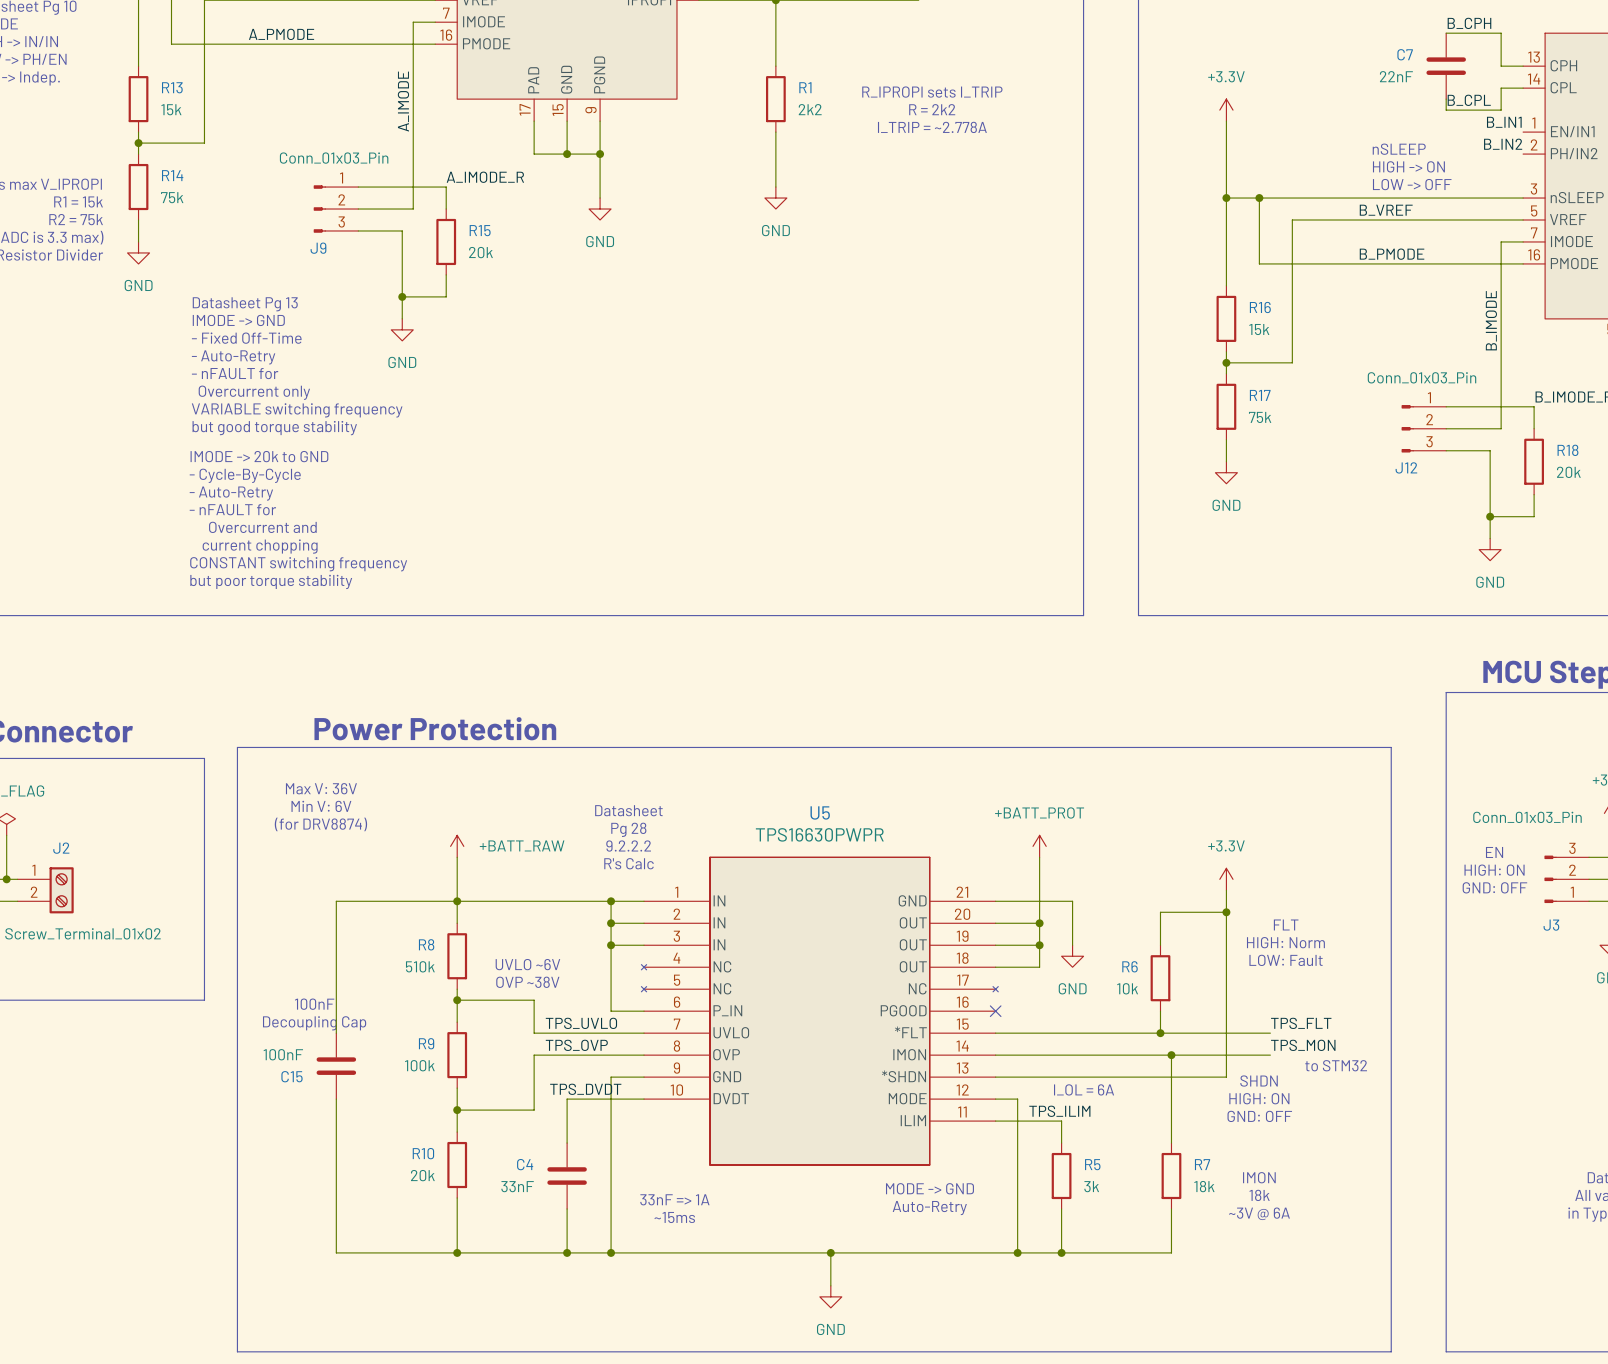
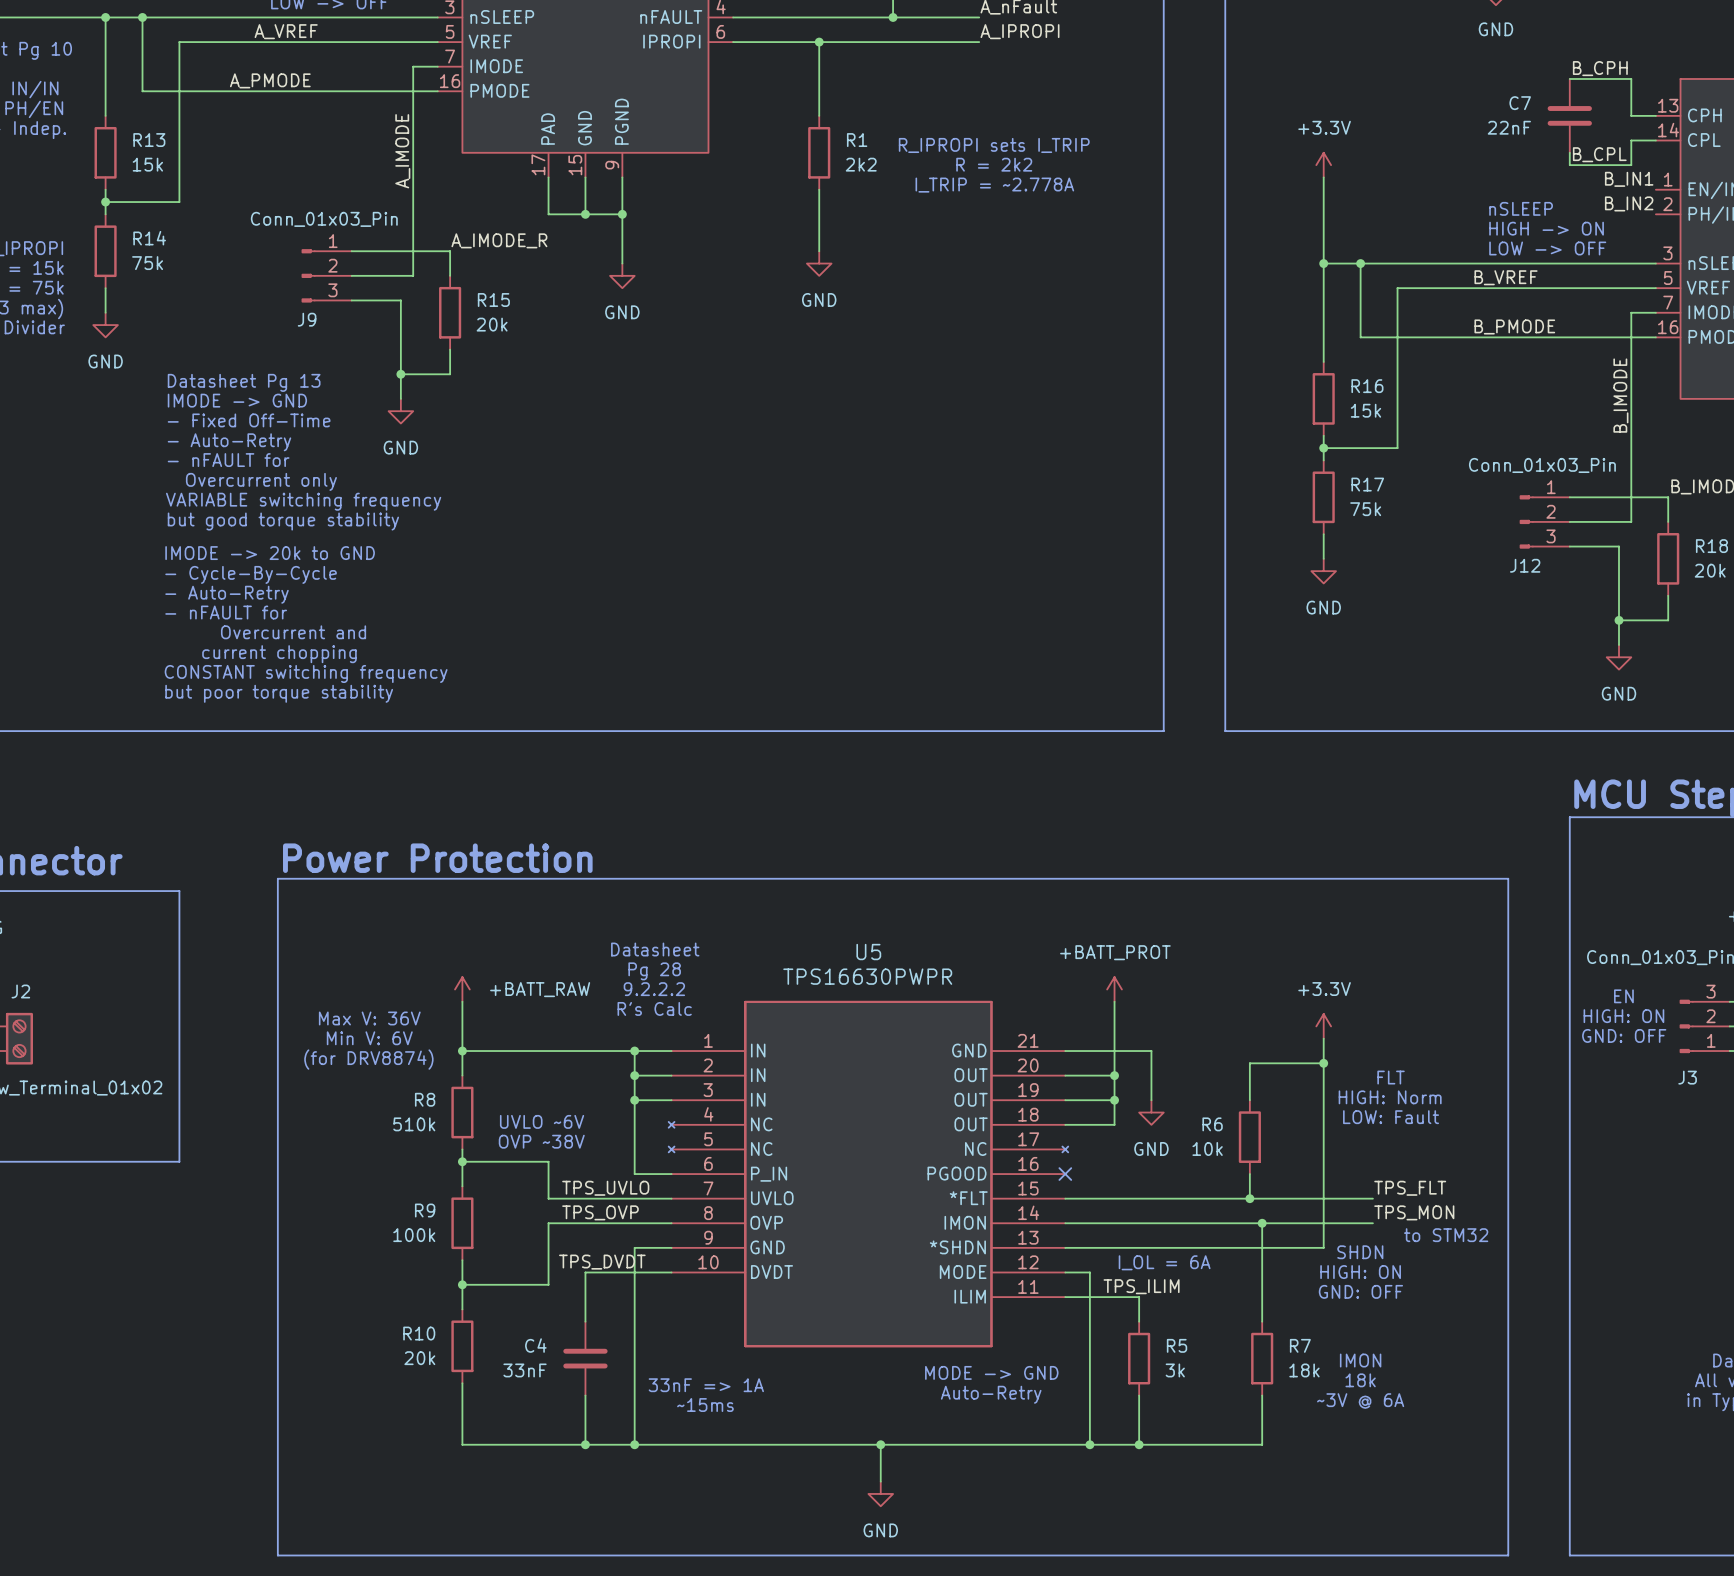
line: (292, 747) (237, 747) (237, 1351) (292, 1351) -> (277, 878) (277, 1555)
text position: Max V: 36V (321, 788) -> Max V: 36V (369, 1018)
text position: Min V: 6V (321, 806) -> Min V: 6V (369, 1038)
text position: (for DRV8874) (320, 824) -> (for DRV8874) (368, 1059)
wire: (457, 901) (336, 901) (336, 1033) -> none
text: 100nF (314, 1004) -> none
text: Decoupling Cap (314, 1023) -> none
C15: 100nF (336, 1066) -> none
wire: (336, 1099) (336, 1252) (457, 1252) -> none
junction: (457, 1252) -> none

